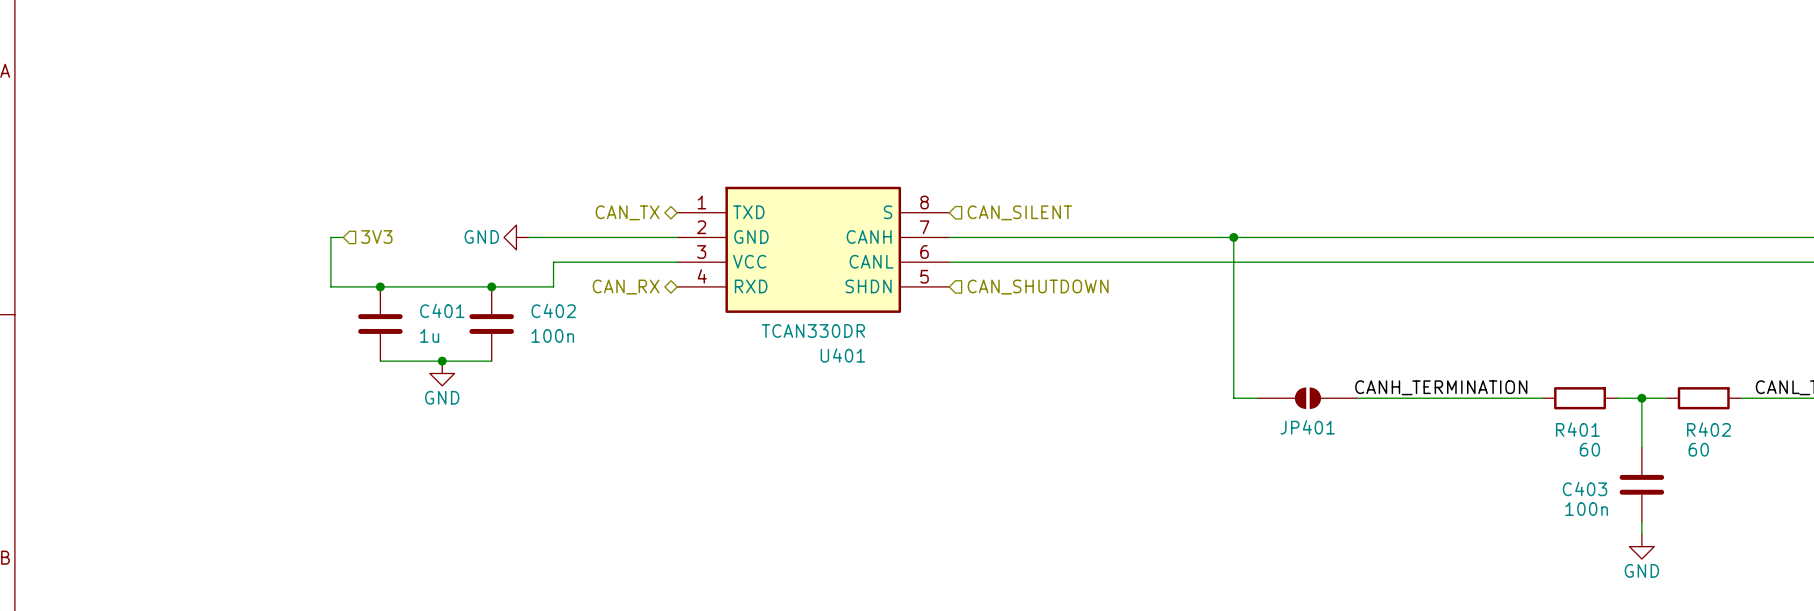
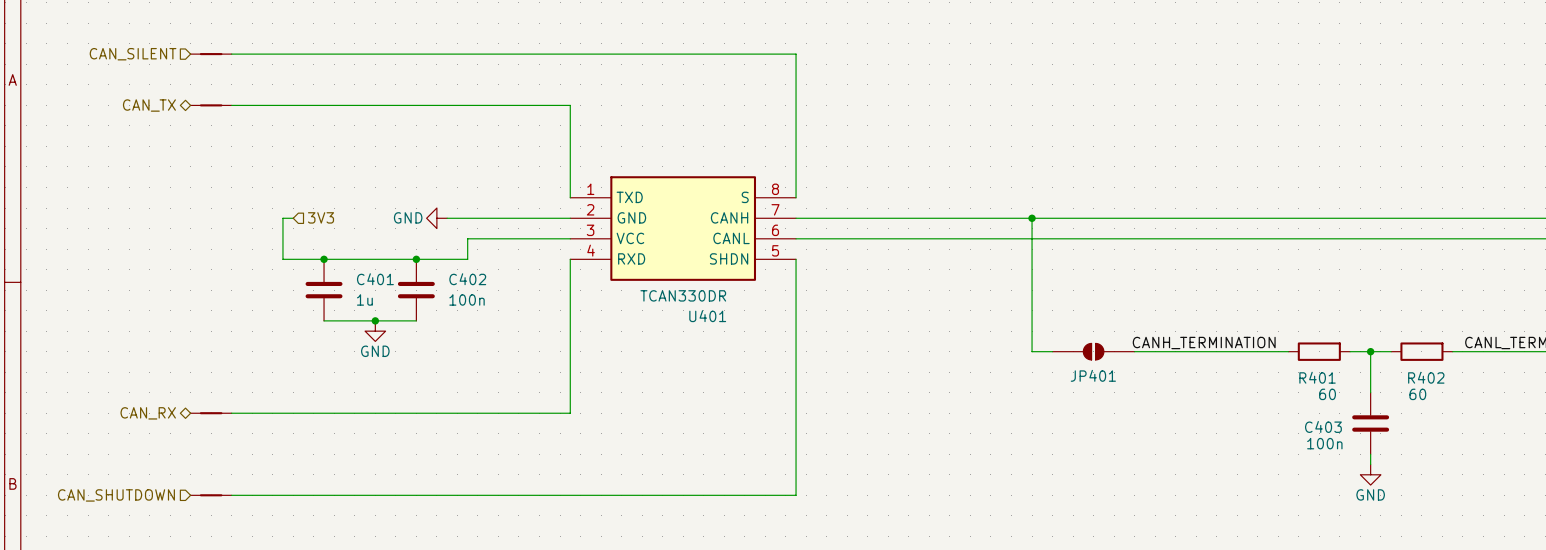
hierarchical label: none -> CAN_SILENT (133, 54)
part: none -> (211, 54)
wire: none -> (231, 54) (796, 54) (796, 197)
hierarchical label: none -> CAN_TX (149, 105)
part: none -> (211, 105)
wire: none -> (231, 105) (570, 105) (570, 197)
hierarchical label: CAN_TX (627, 212) -> none
hierarchical label: CAN_SILENT (1019, 212) -> none
wire: none -> (570, 259) (570, 413) (231, 413)
wire: none -> (796, 259) (796, 495) (231, 495)
hierarchical label: CAN_RX (626, 287) -> none
hierarchical label: CAN_SHUTDOWN (1038, 287) -> none
hierarchical label: none -> CAN_RX (148, 413)
part: none -> (211, 413)
hierarchical label: none -> CAN_SHUTDOWN (116, 495)
part: none -> (211, 495)

